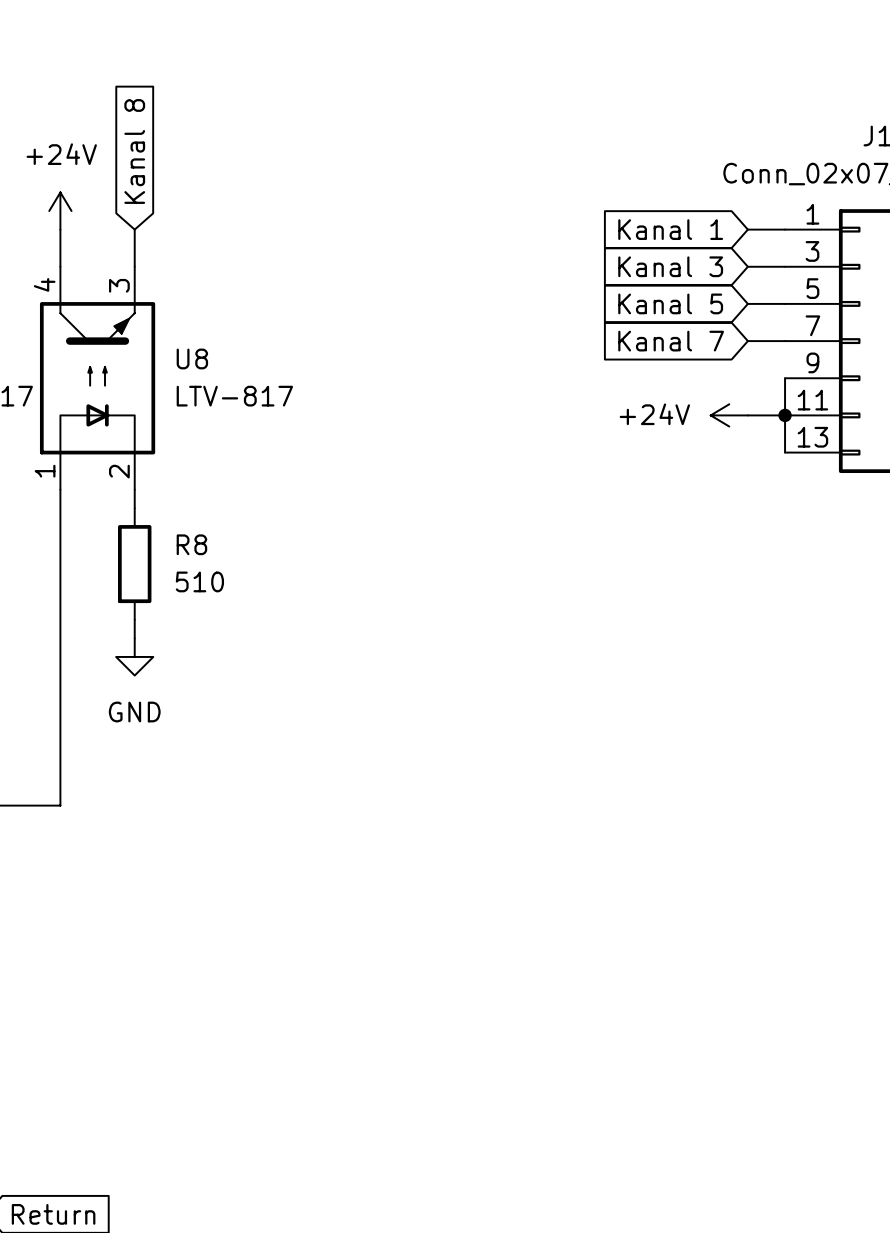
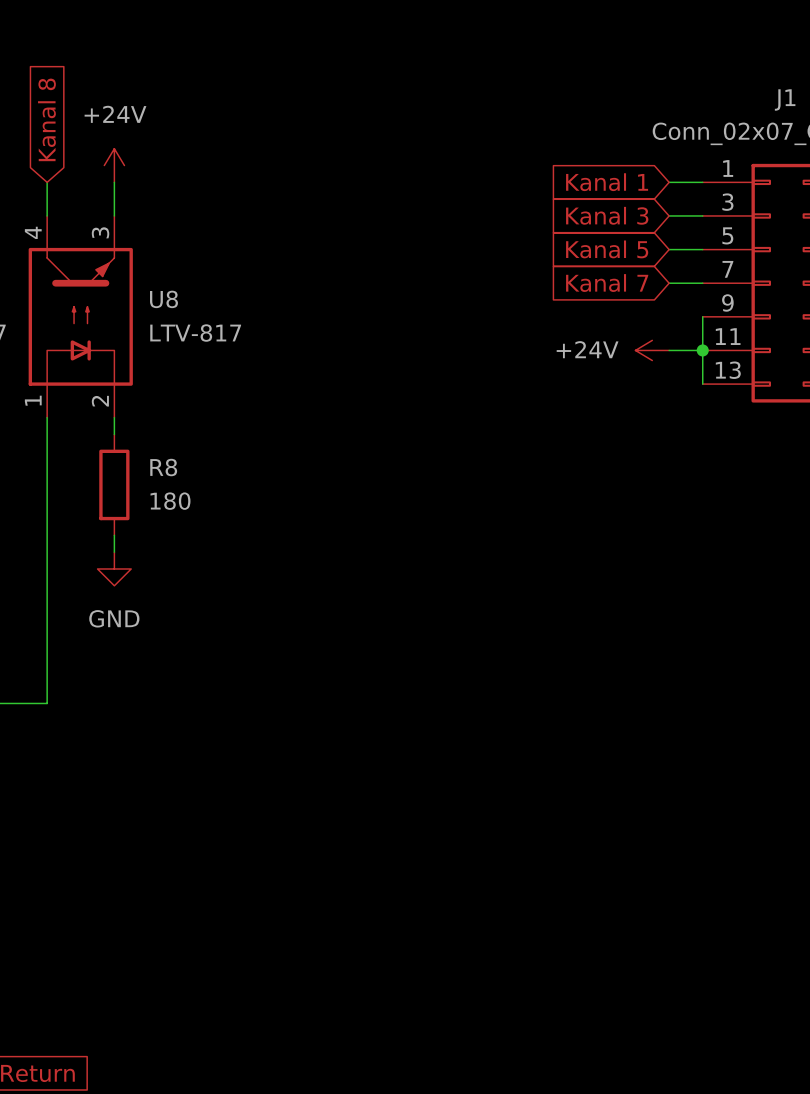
global label position: Kanal 8 (134, 151) -> Kanal 8 (46, 119)
power symbol position: +24V (60, 211) -> +24V (114, 165)
R8 value: 510 (199, 581) -> 180 (170, 501)

